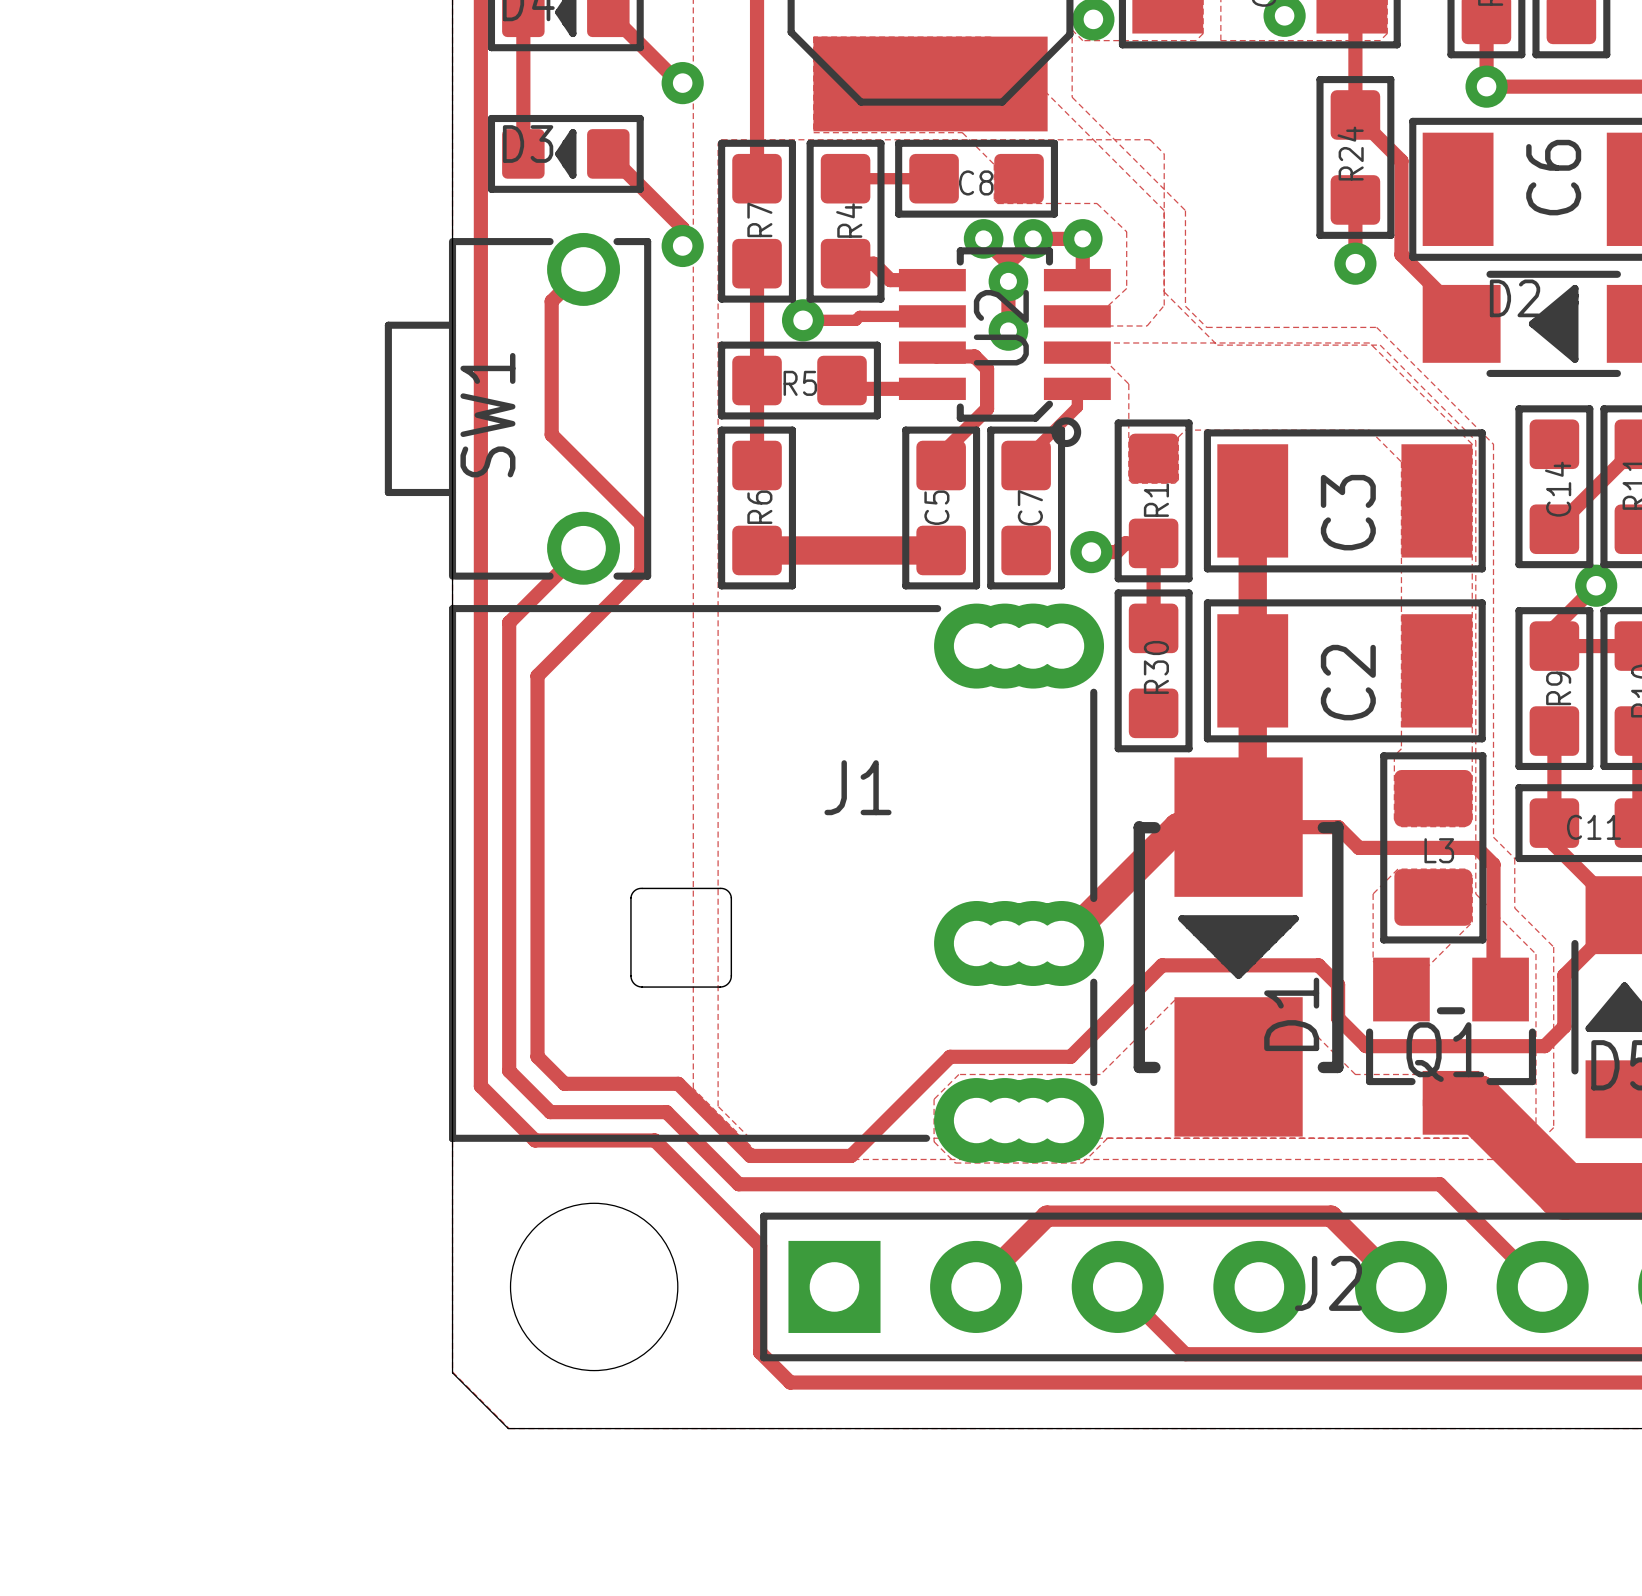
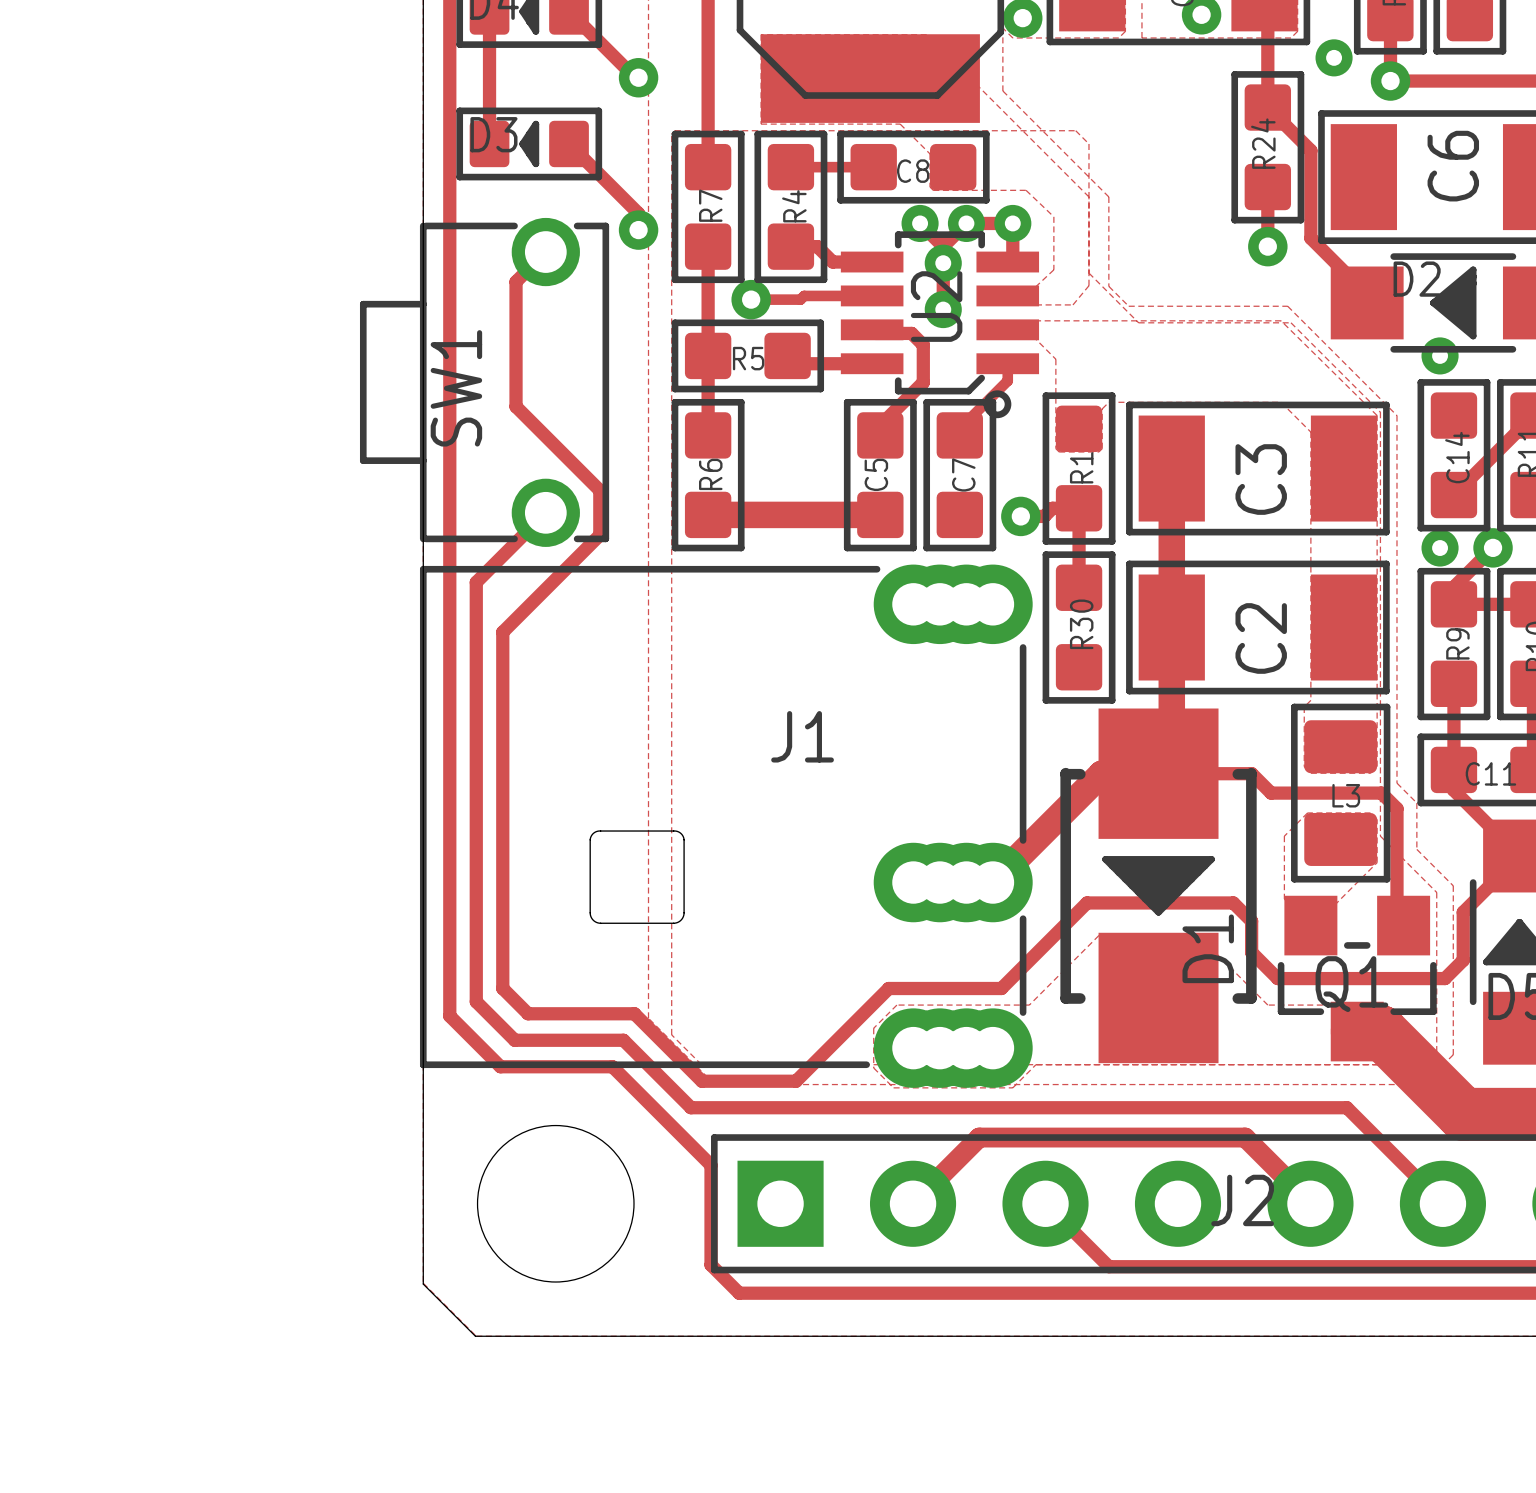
via: none -> (1334, 57)
via: none -> (1440, 355)
via: none -> (1440, 548)

